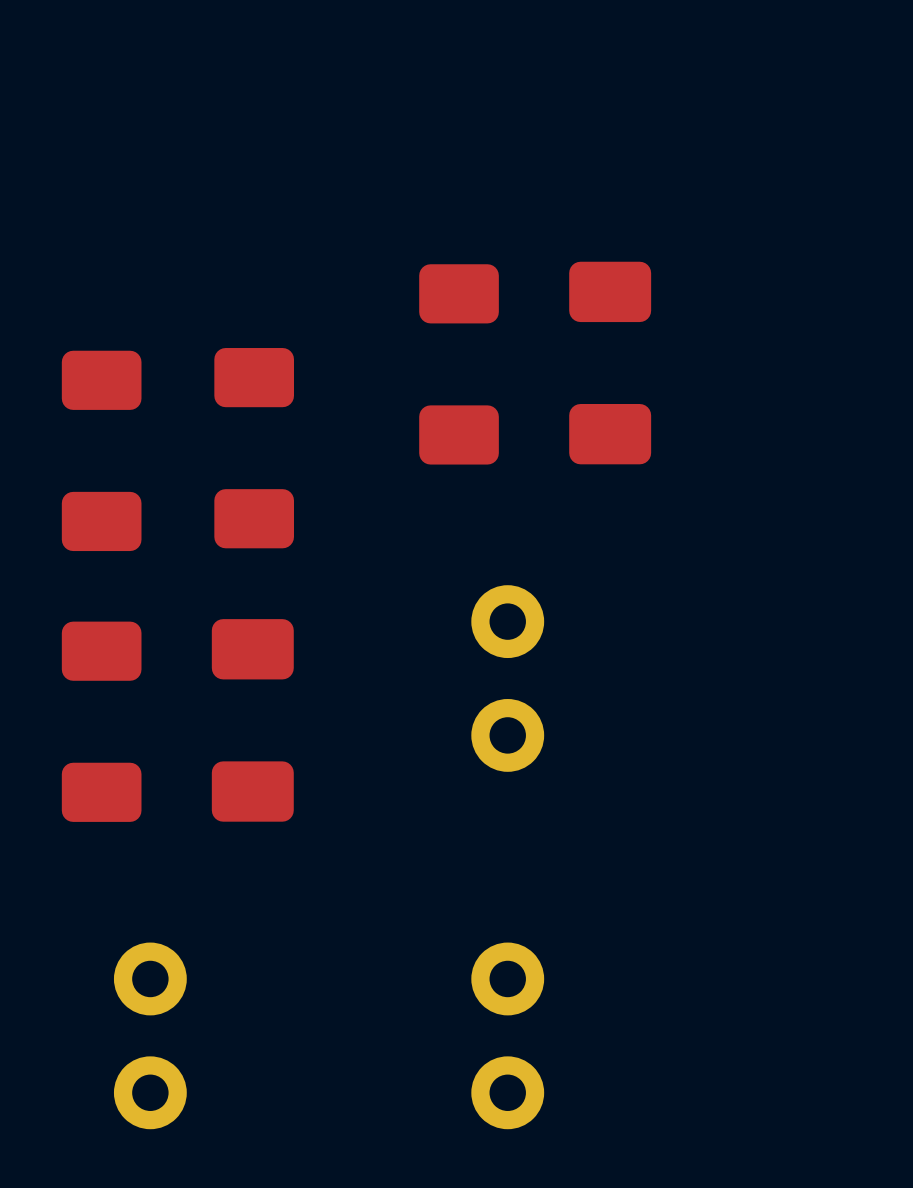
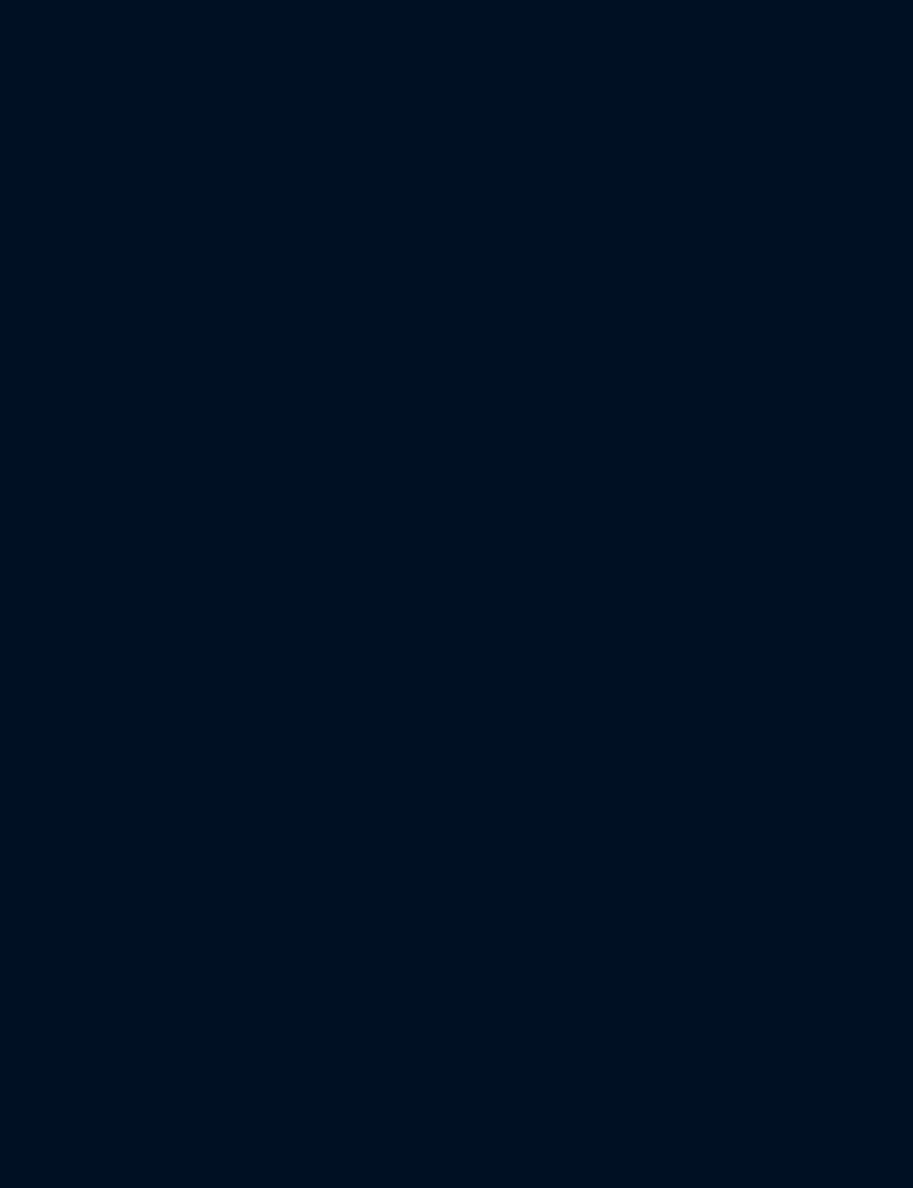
part: (610, 363) -> none
part: (459, 364) -> none
part: (254, 448) -> none
part: (101, 450) -> none
part: (507, 678) -> none
part: (252, 720) -> none
part: (101, 721) -> none
part: (150, 1035) -> none
part: (507, 1035) -> none

